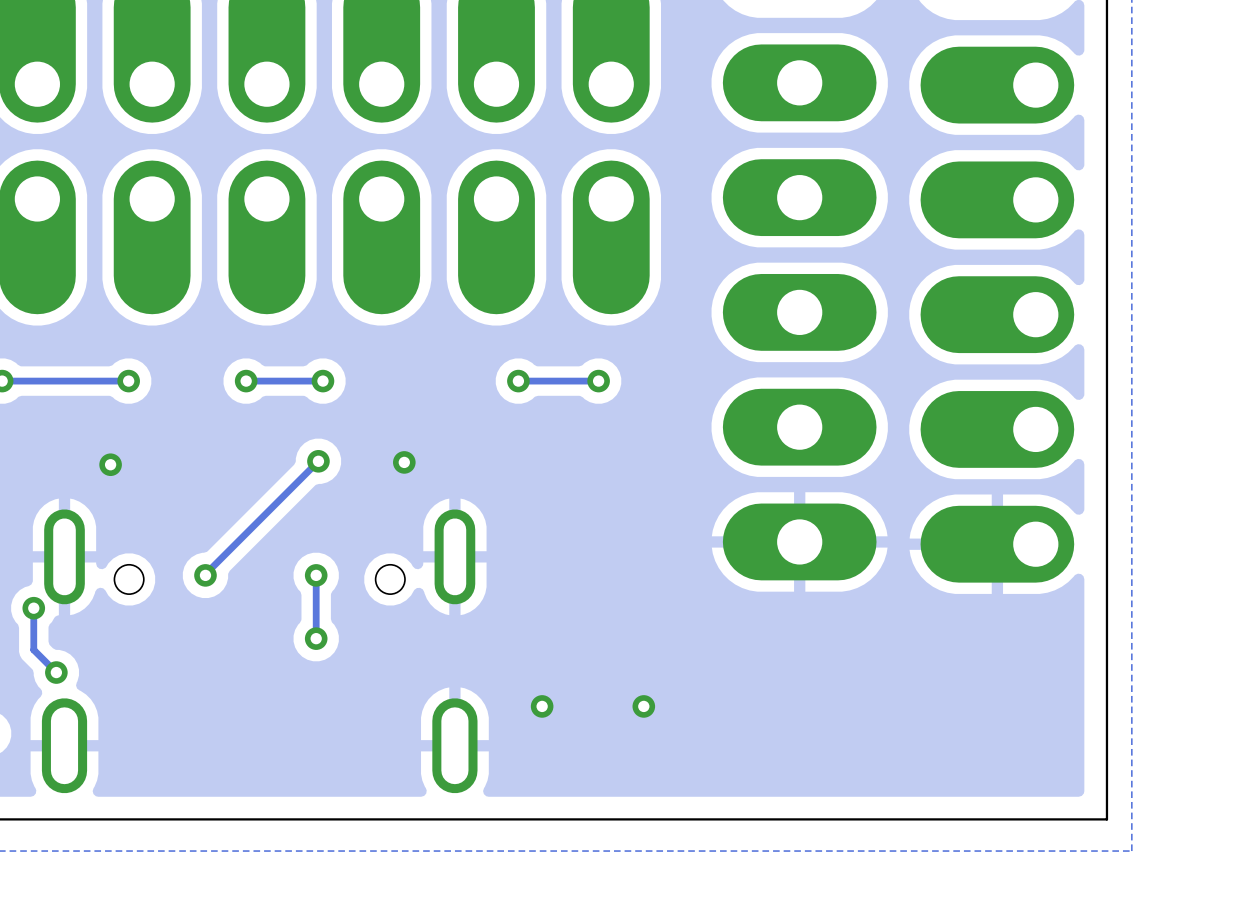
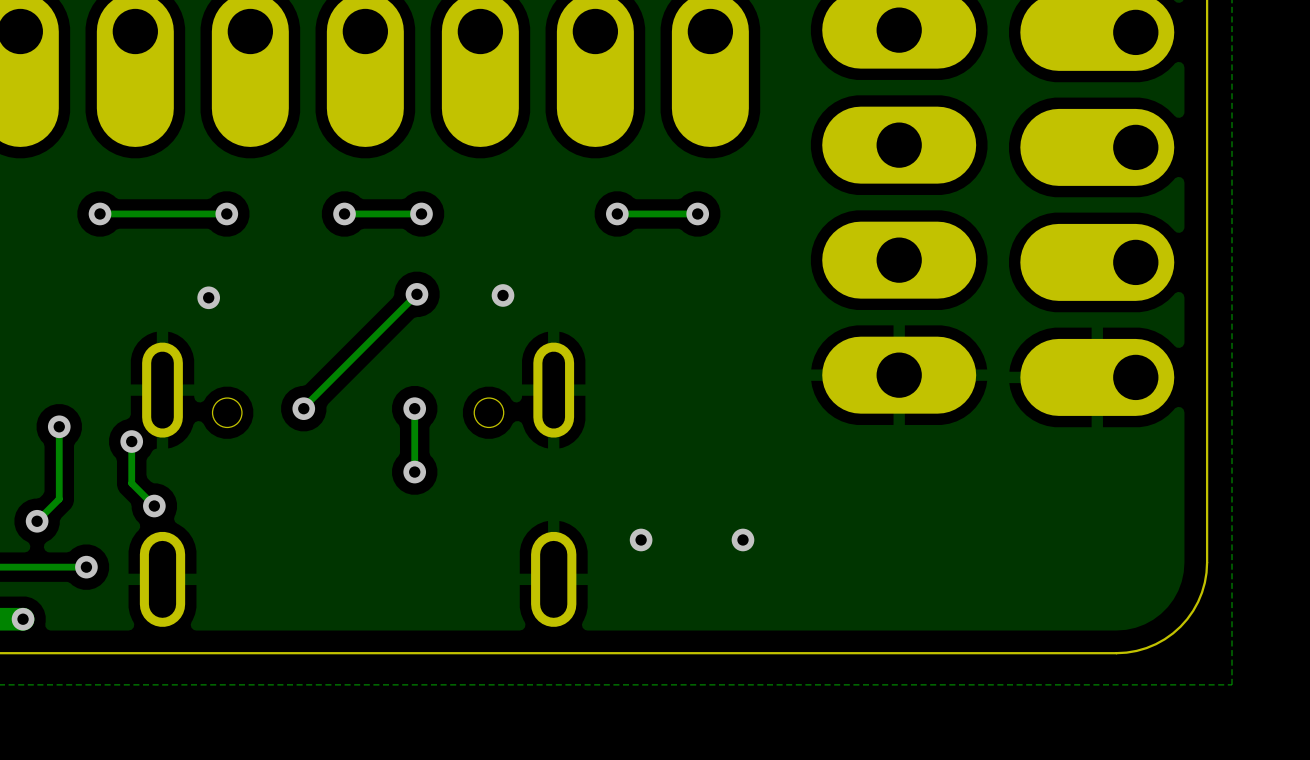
board edge: (1106, 729) (1106, 819) (1016, 819) -> (1207, 562) (1202, 592) (1193, 610) (1180, 626) (1155, 644) (1136, 650) (1116, 653)

